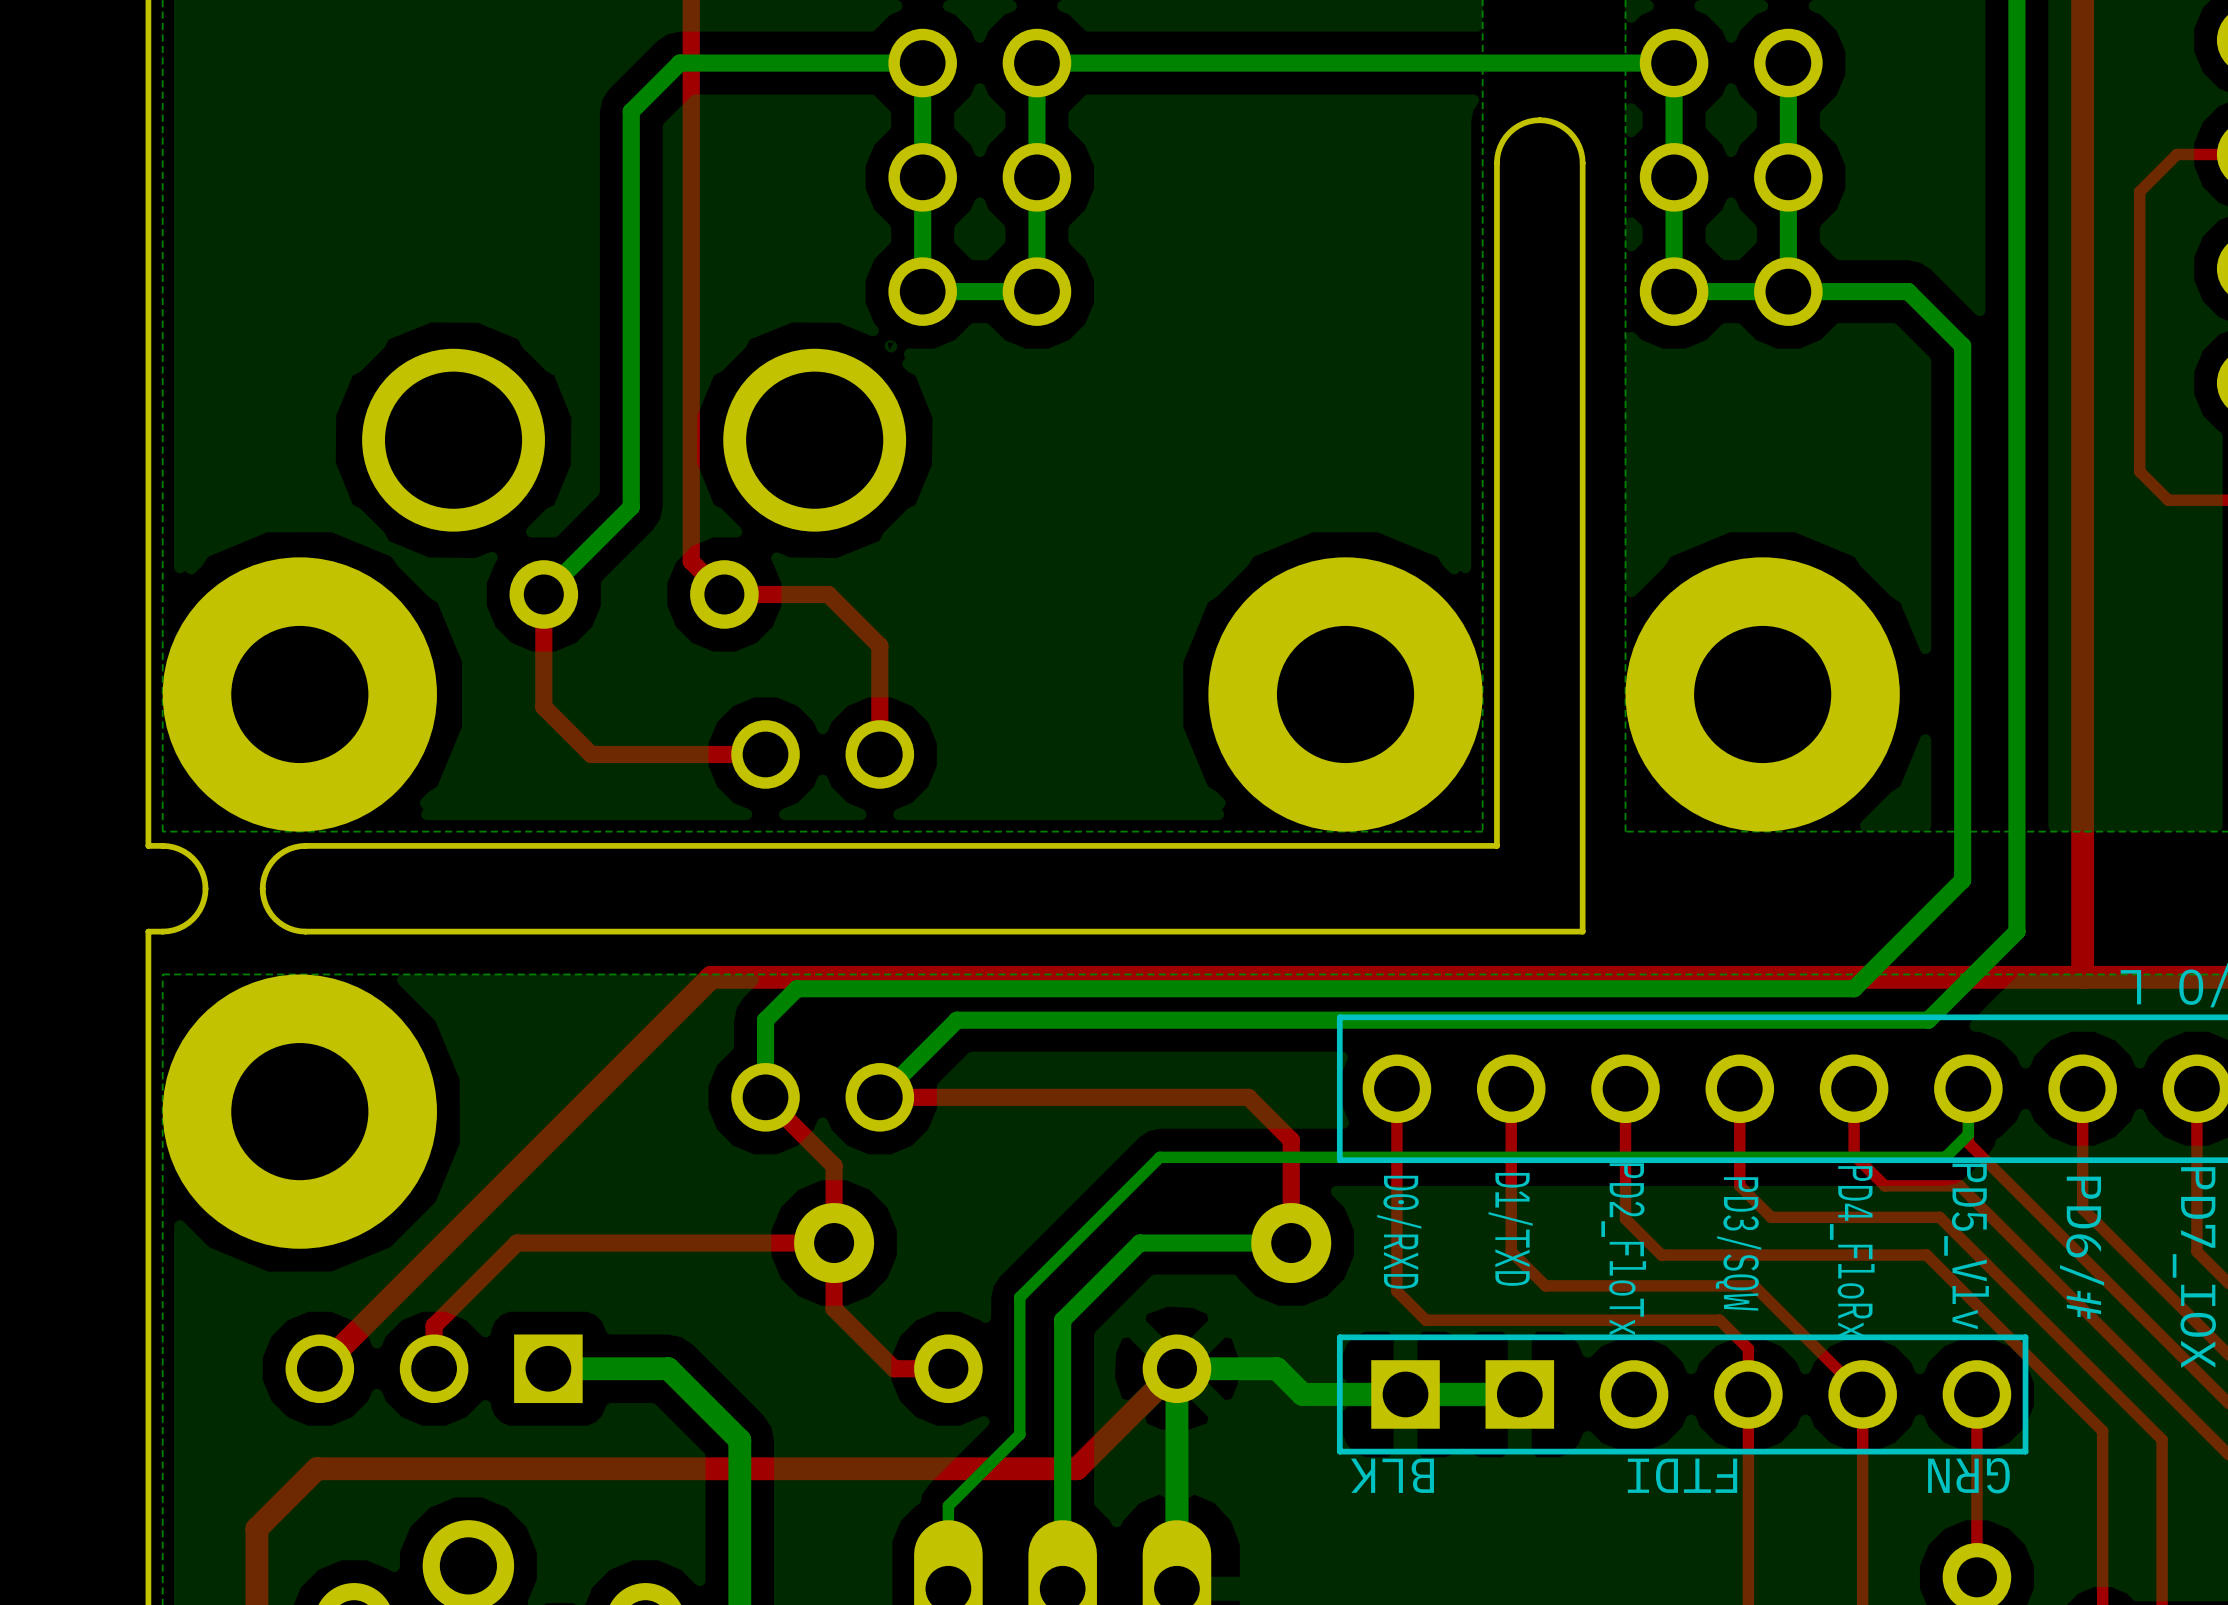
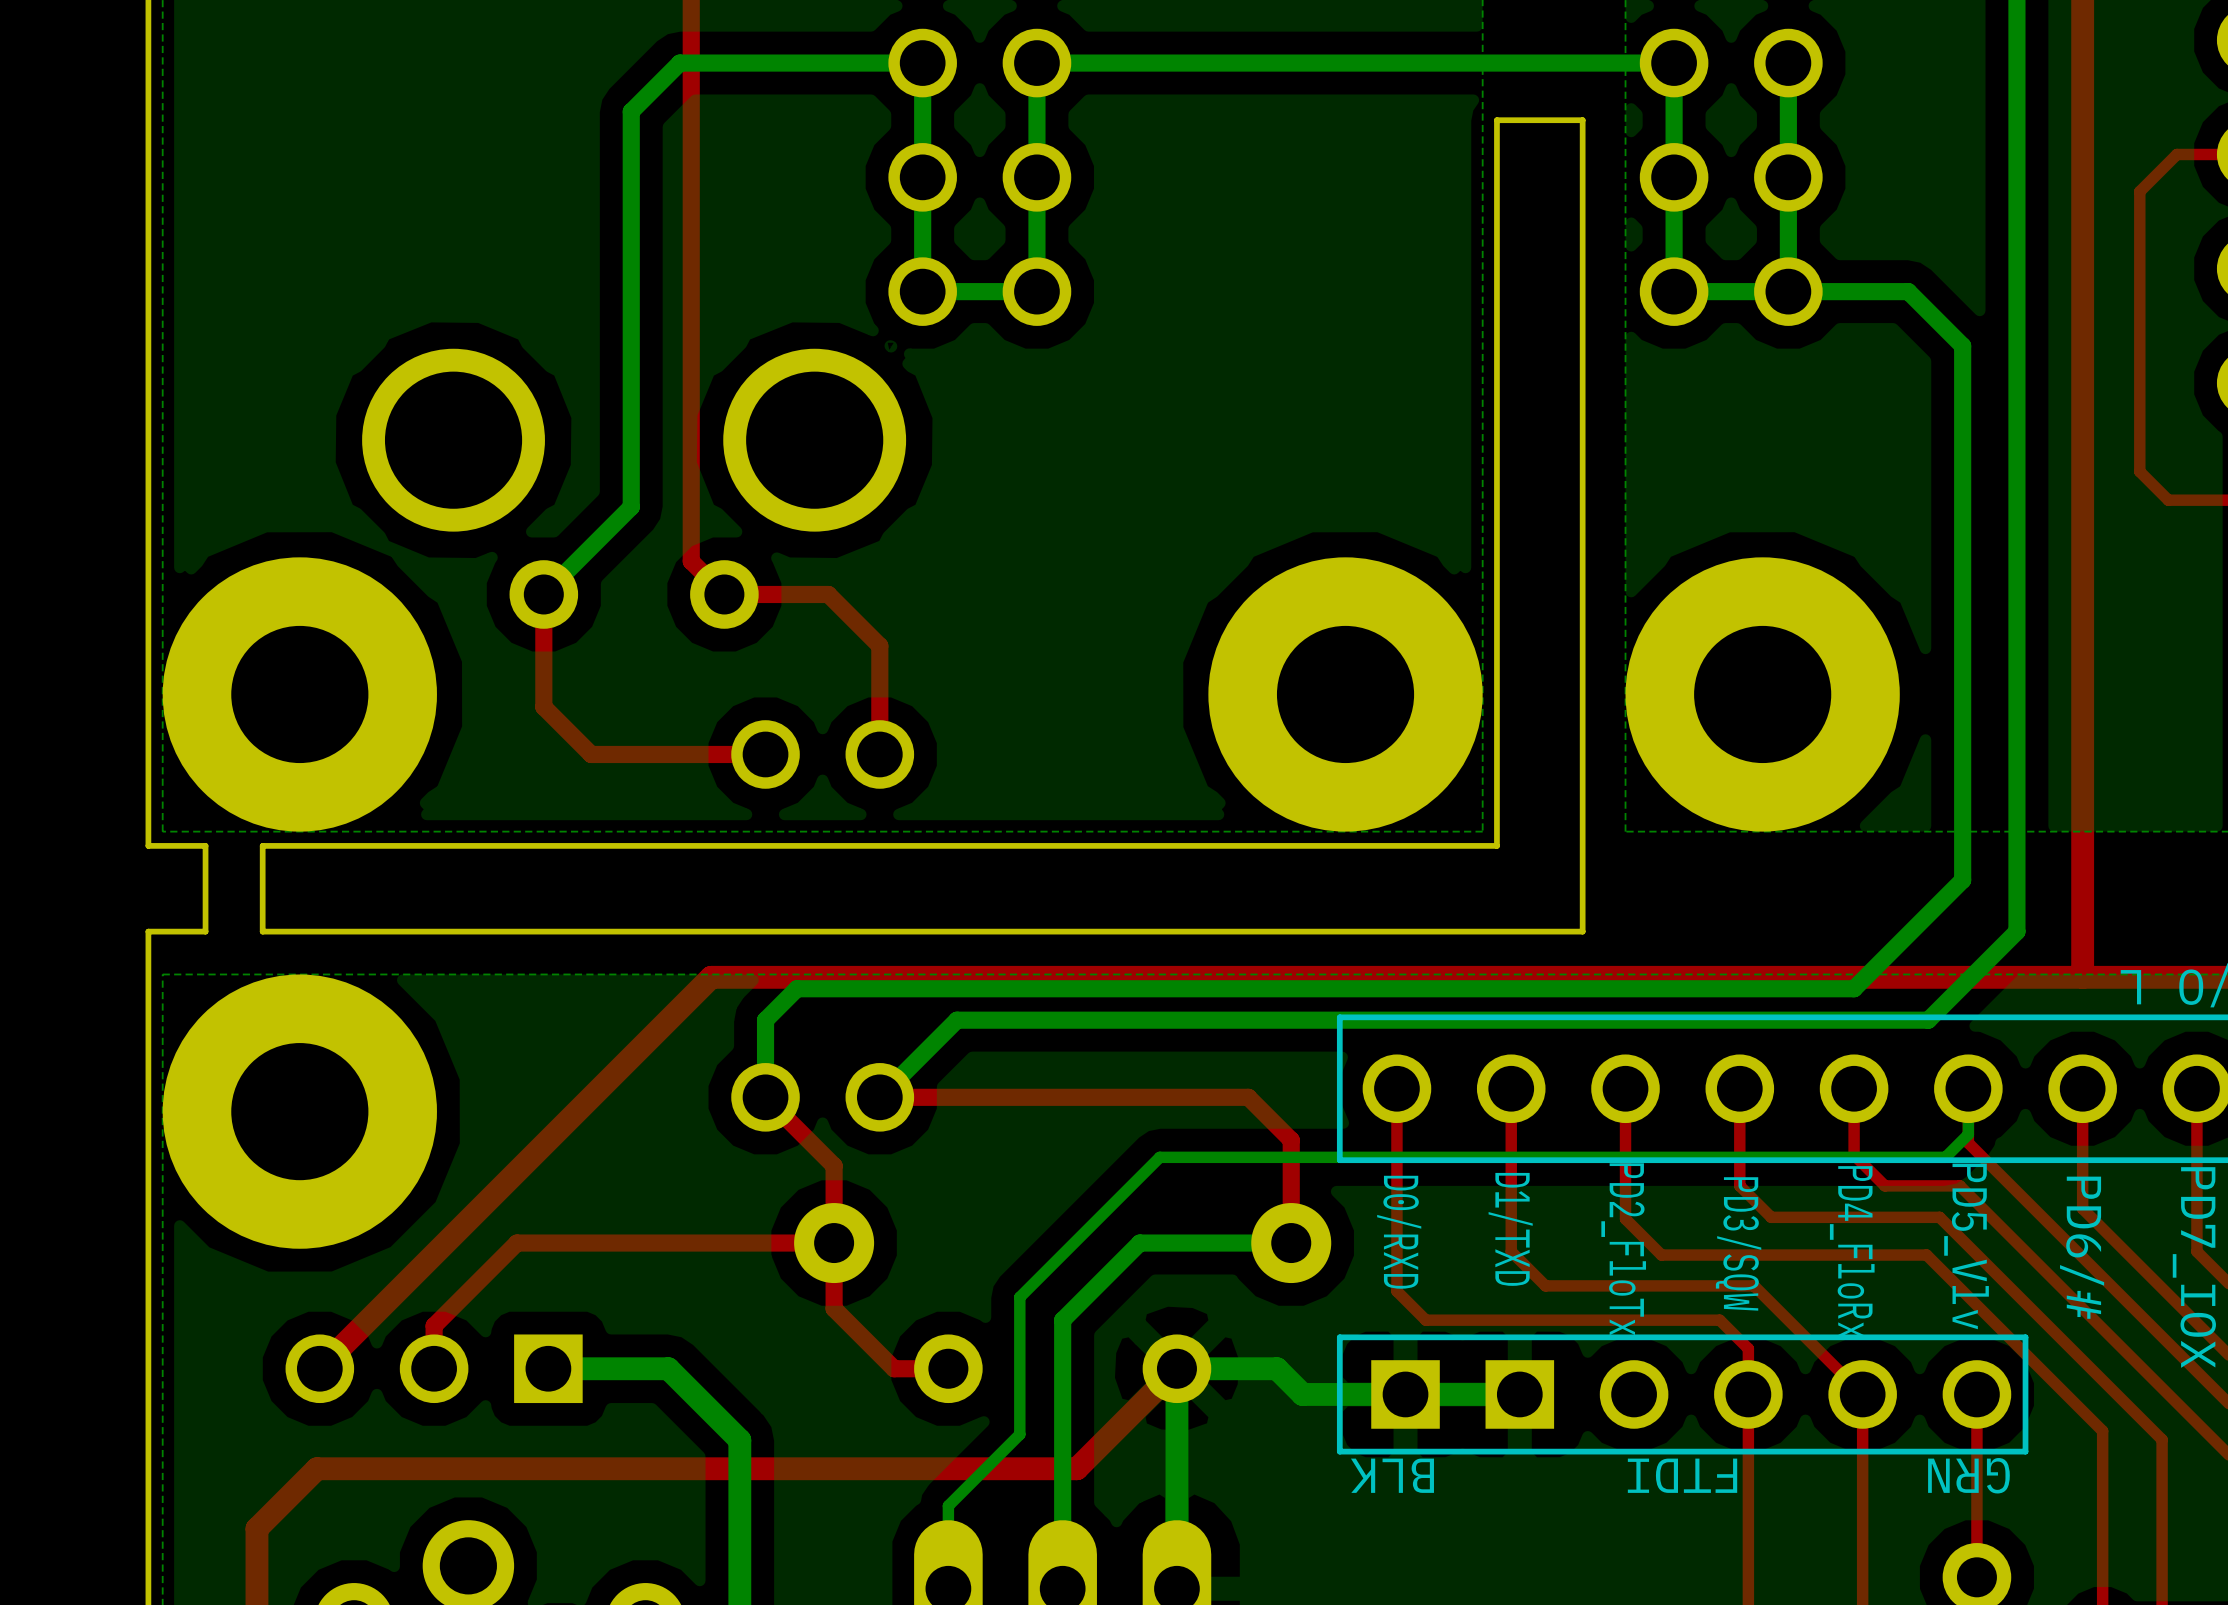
board edge: (1582, 163) (1579, 146) (1570, 132) (1556, 123) (1539, 120) (1523, 123) (1509, 132) (1500, 146) (1496, 163) -> (1582, 163) (1582, 120) (1496, 120) (1496, 163)
board edge: (162, 845) (179, 849) (192, 858) (202, 872) (205, 888) (202, 905) (192, 919) (179, 928) (162, 931) -> (162, 845) (205, 845) (205, 931) (162, 931)
board edge: (305, 845) (289, 849) (275, 858) (265, 872) (262, 888) (265, 905) (275, 919) (289, 928) (305, 931) -> (305, 845) (262, 845) (262, 931) (305, 931)

